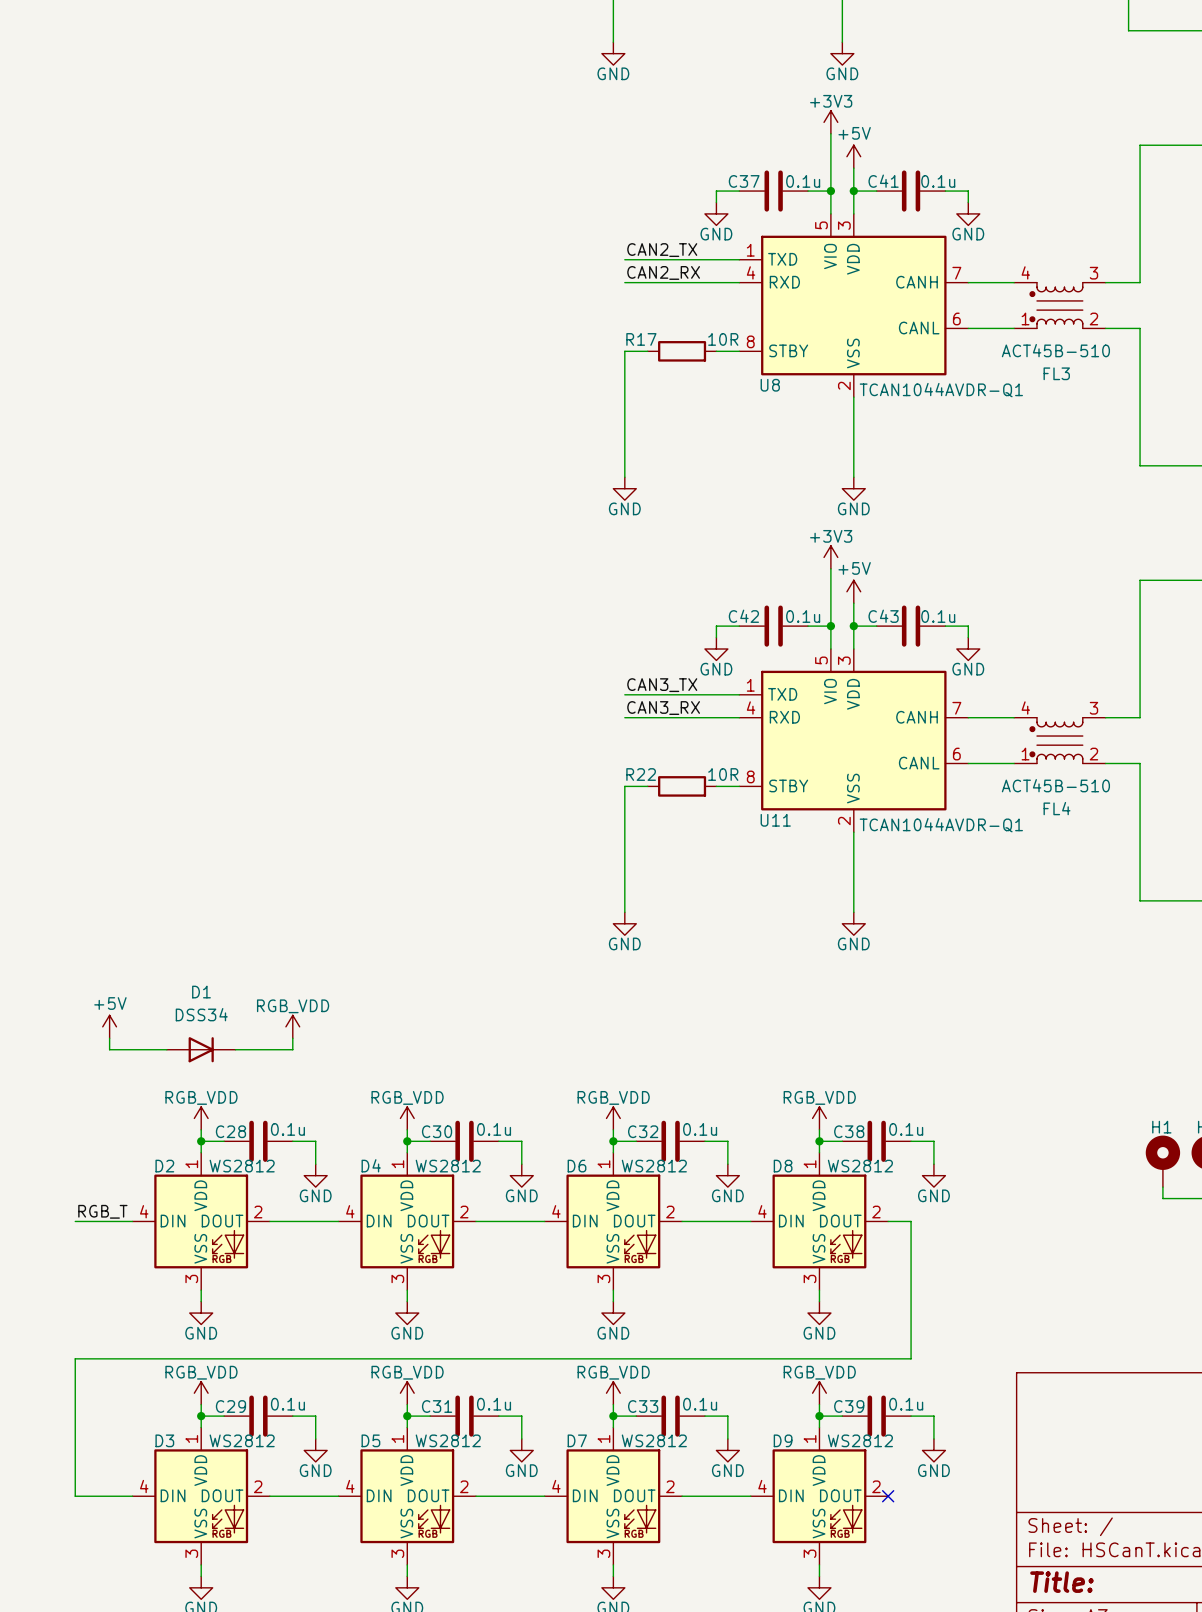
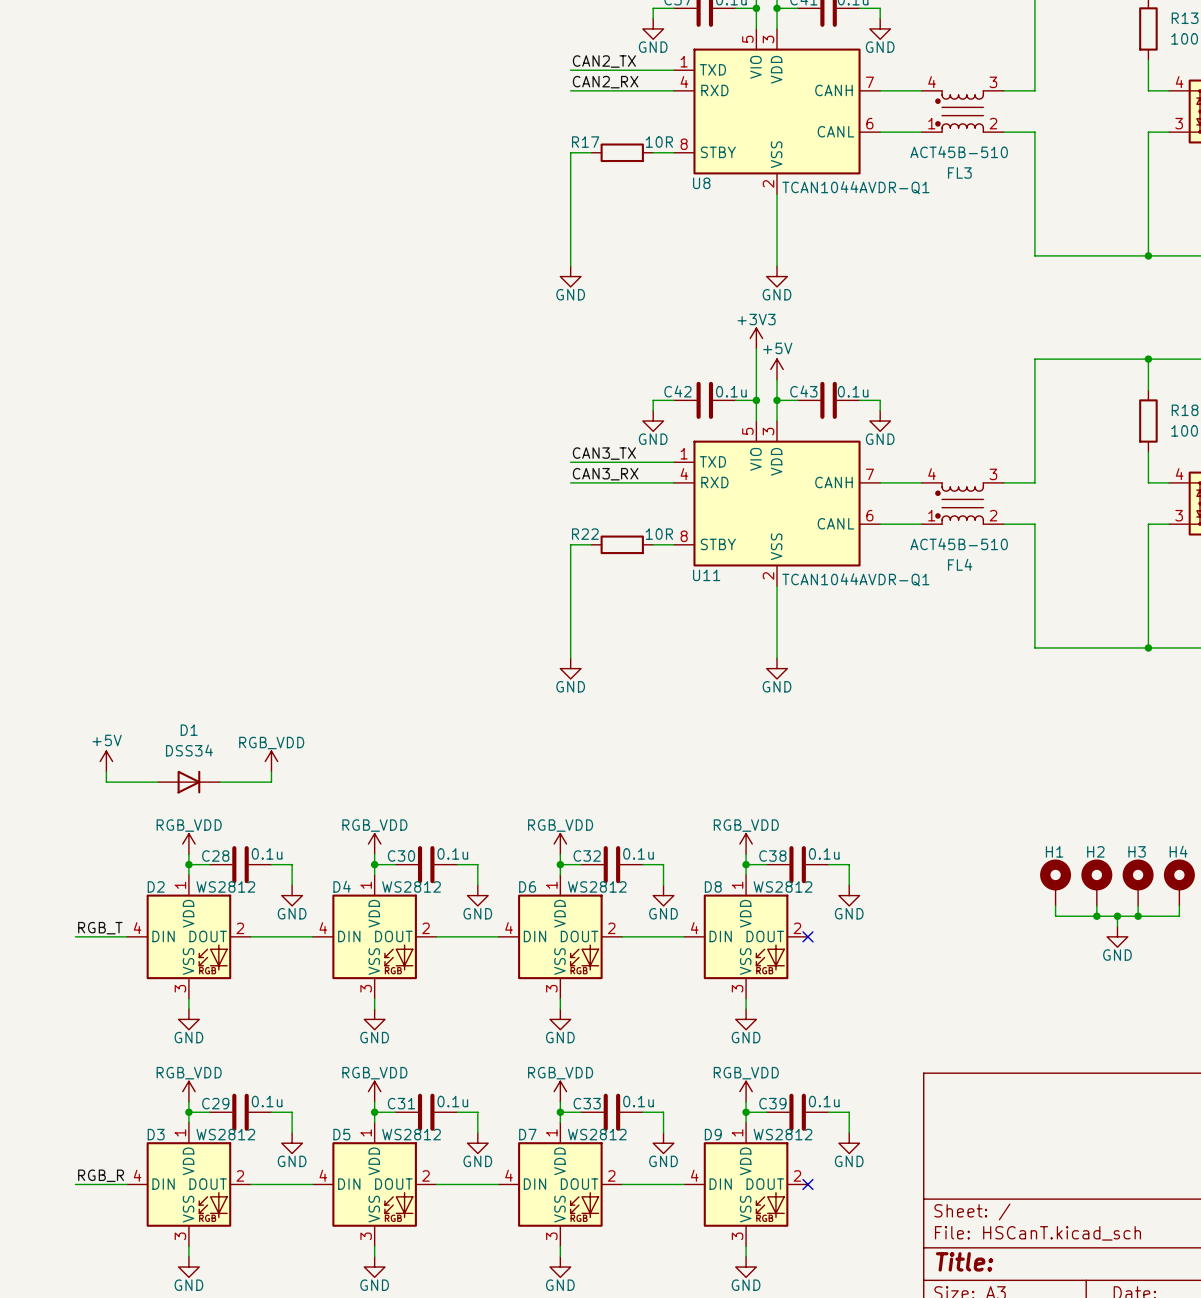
wire: (888, 1221) (911, 1221) (911, 1358) (75, 1358) (75, 1496) -> none
no-connect mark: none -> (807, 936)
label: none -> RGB_R (101, 1175)

